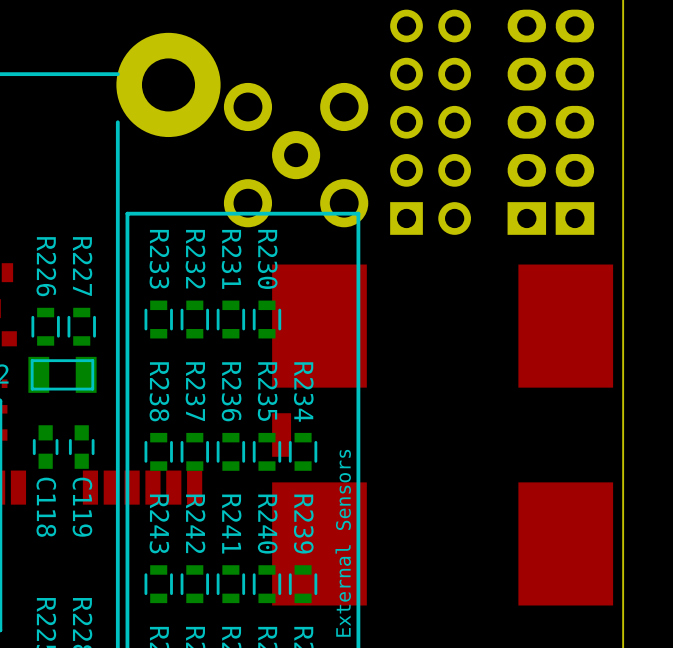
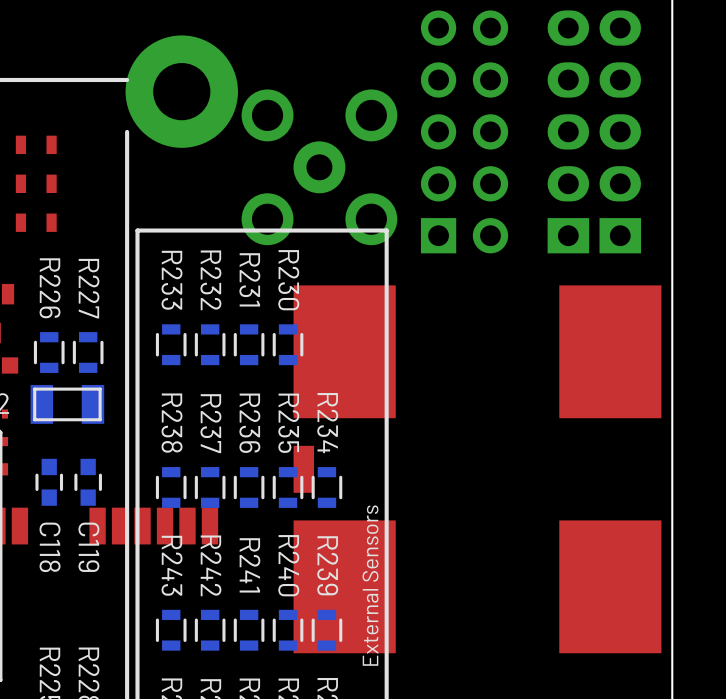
part: none -> (36, 144)
part: none -> (36, 183)
part: none -> (36, 222)

